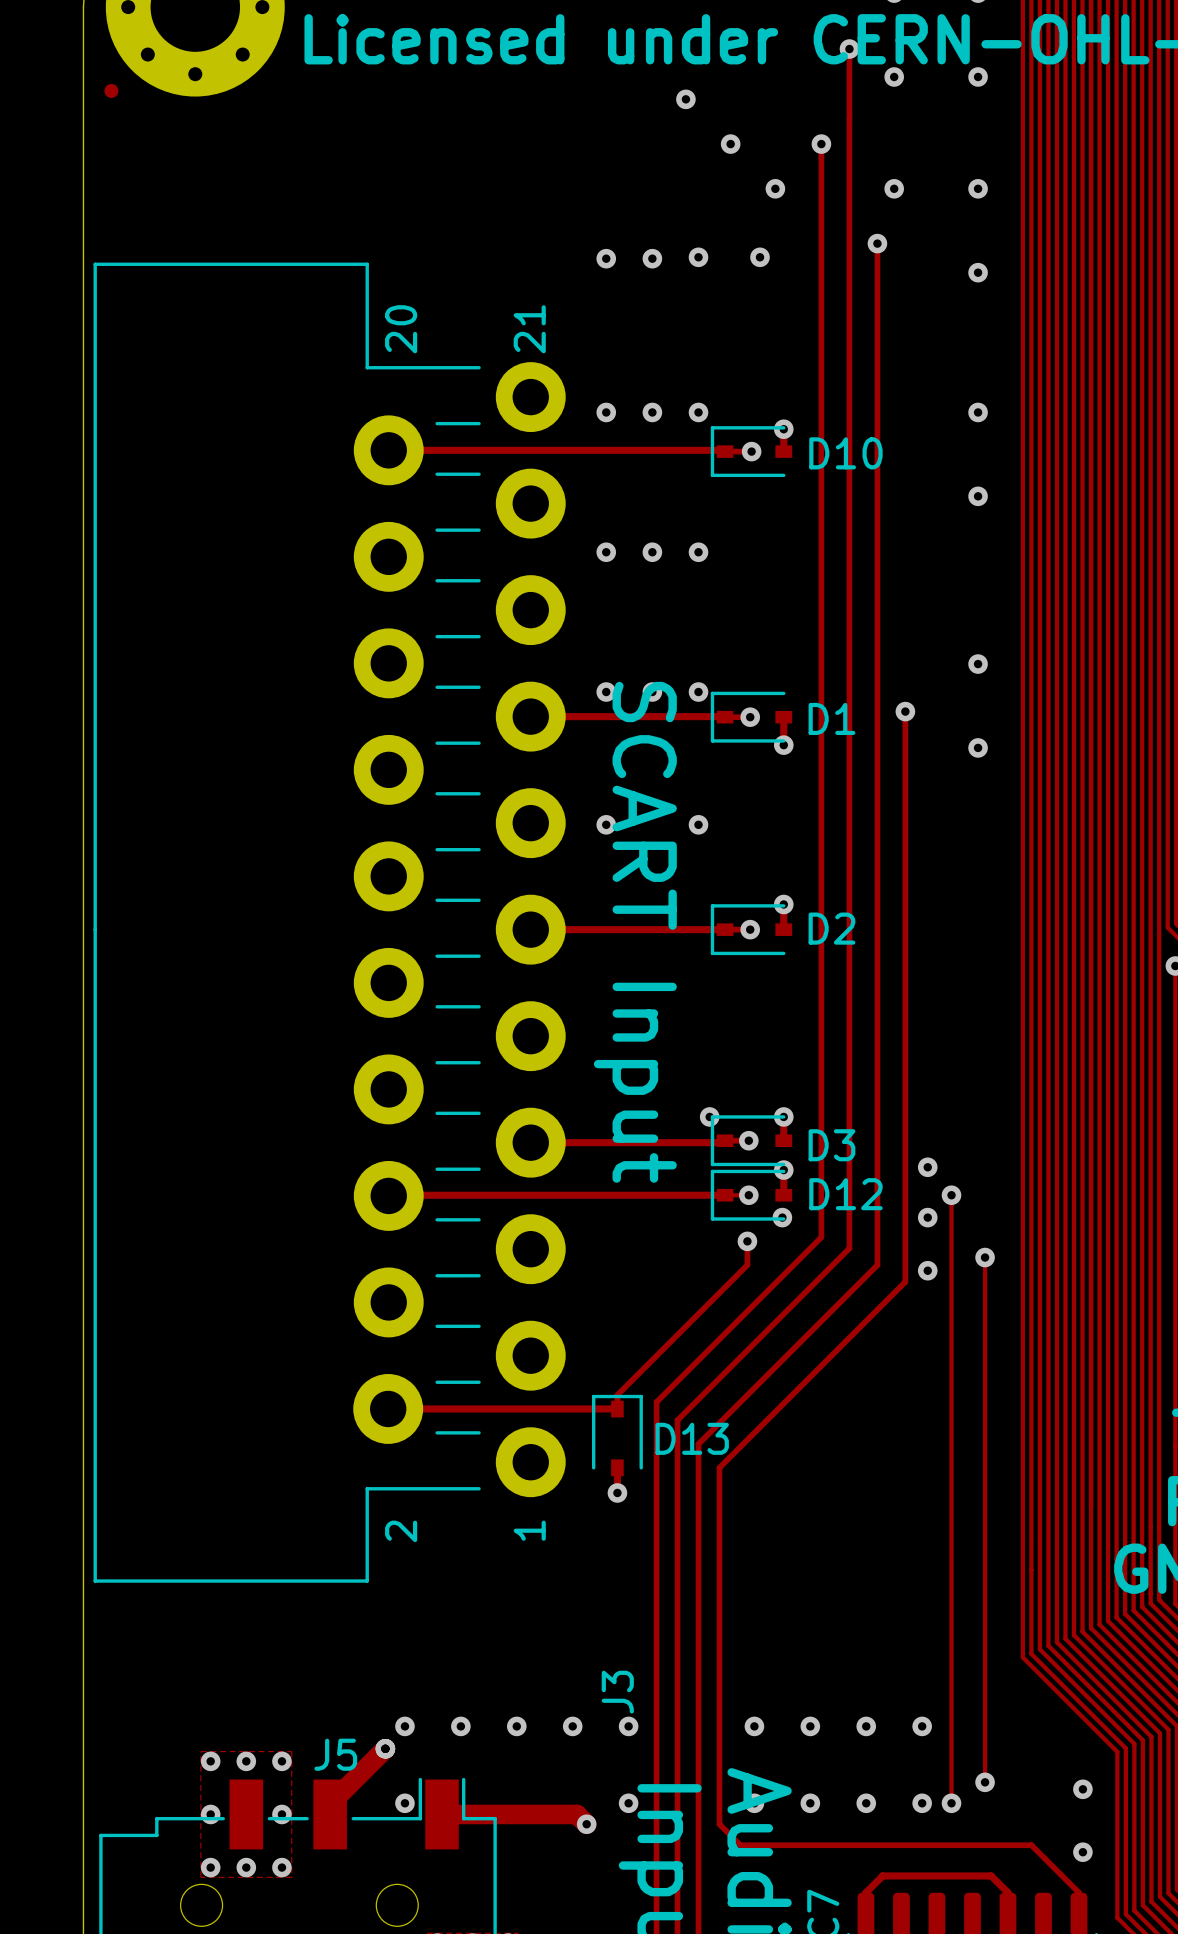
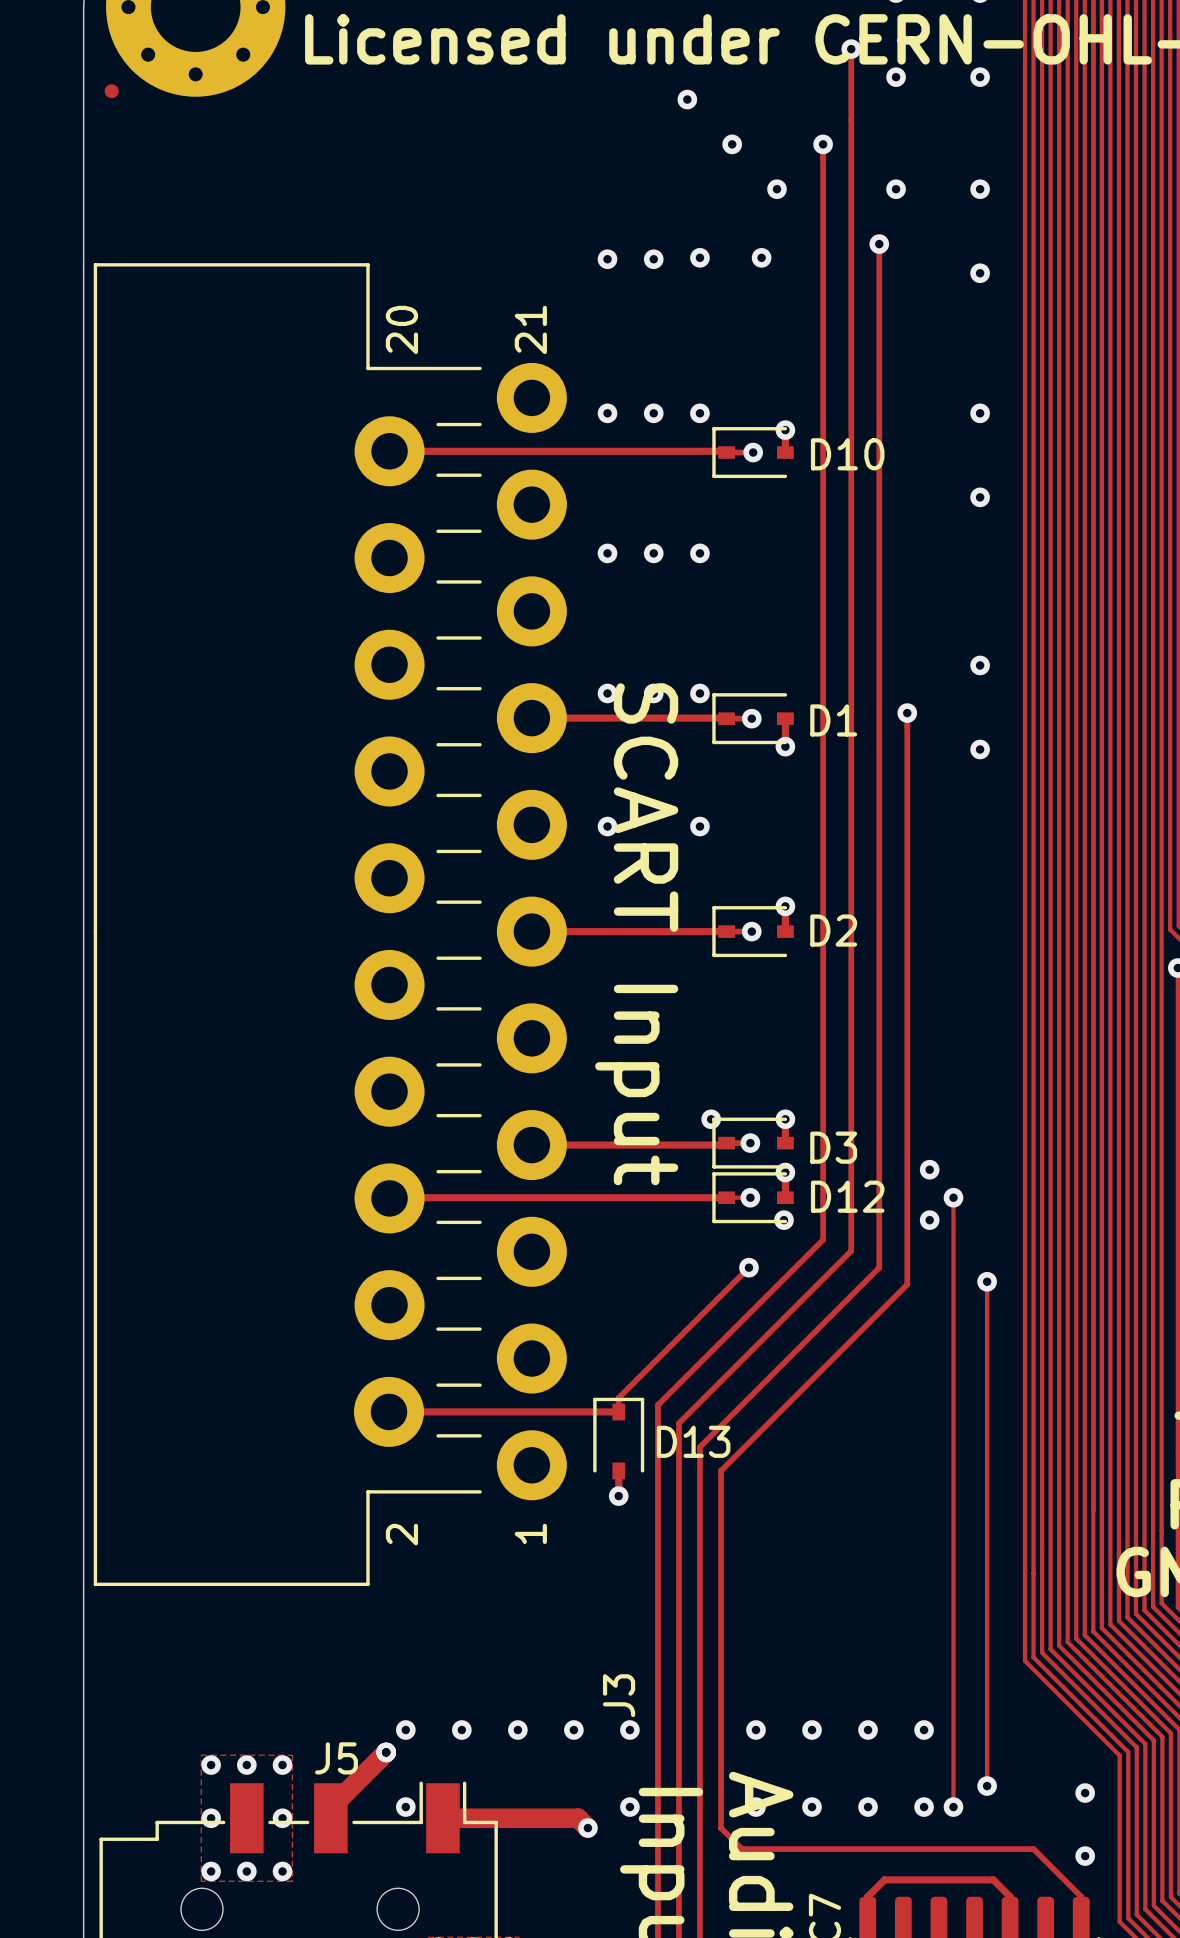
track: (747, 1241) (747, 1265) -> none
via position: (747, 1241) -> (748, 1267)
track: (985, 1257) (985, 1279) -> none
via position: (985, 1257) -> (987, 1281)
via: (927, 1270) -> none

